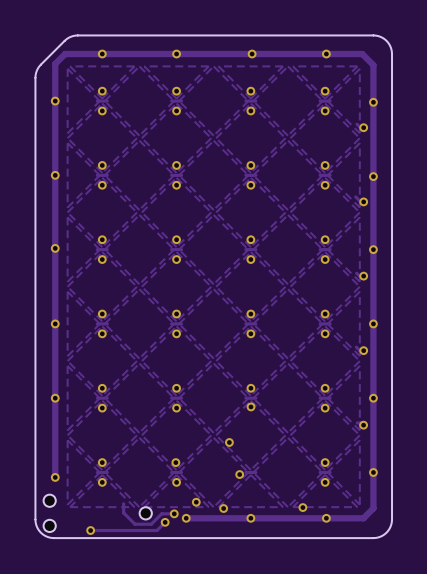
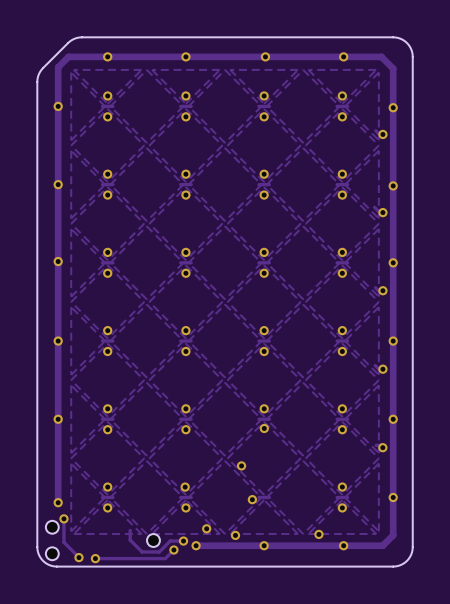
track: none -> (63, 518) (63, 542) (79, 557)
via: none -> (63, 518)
via: none -> (78, 557)

